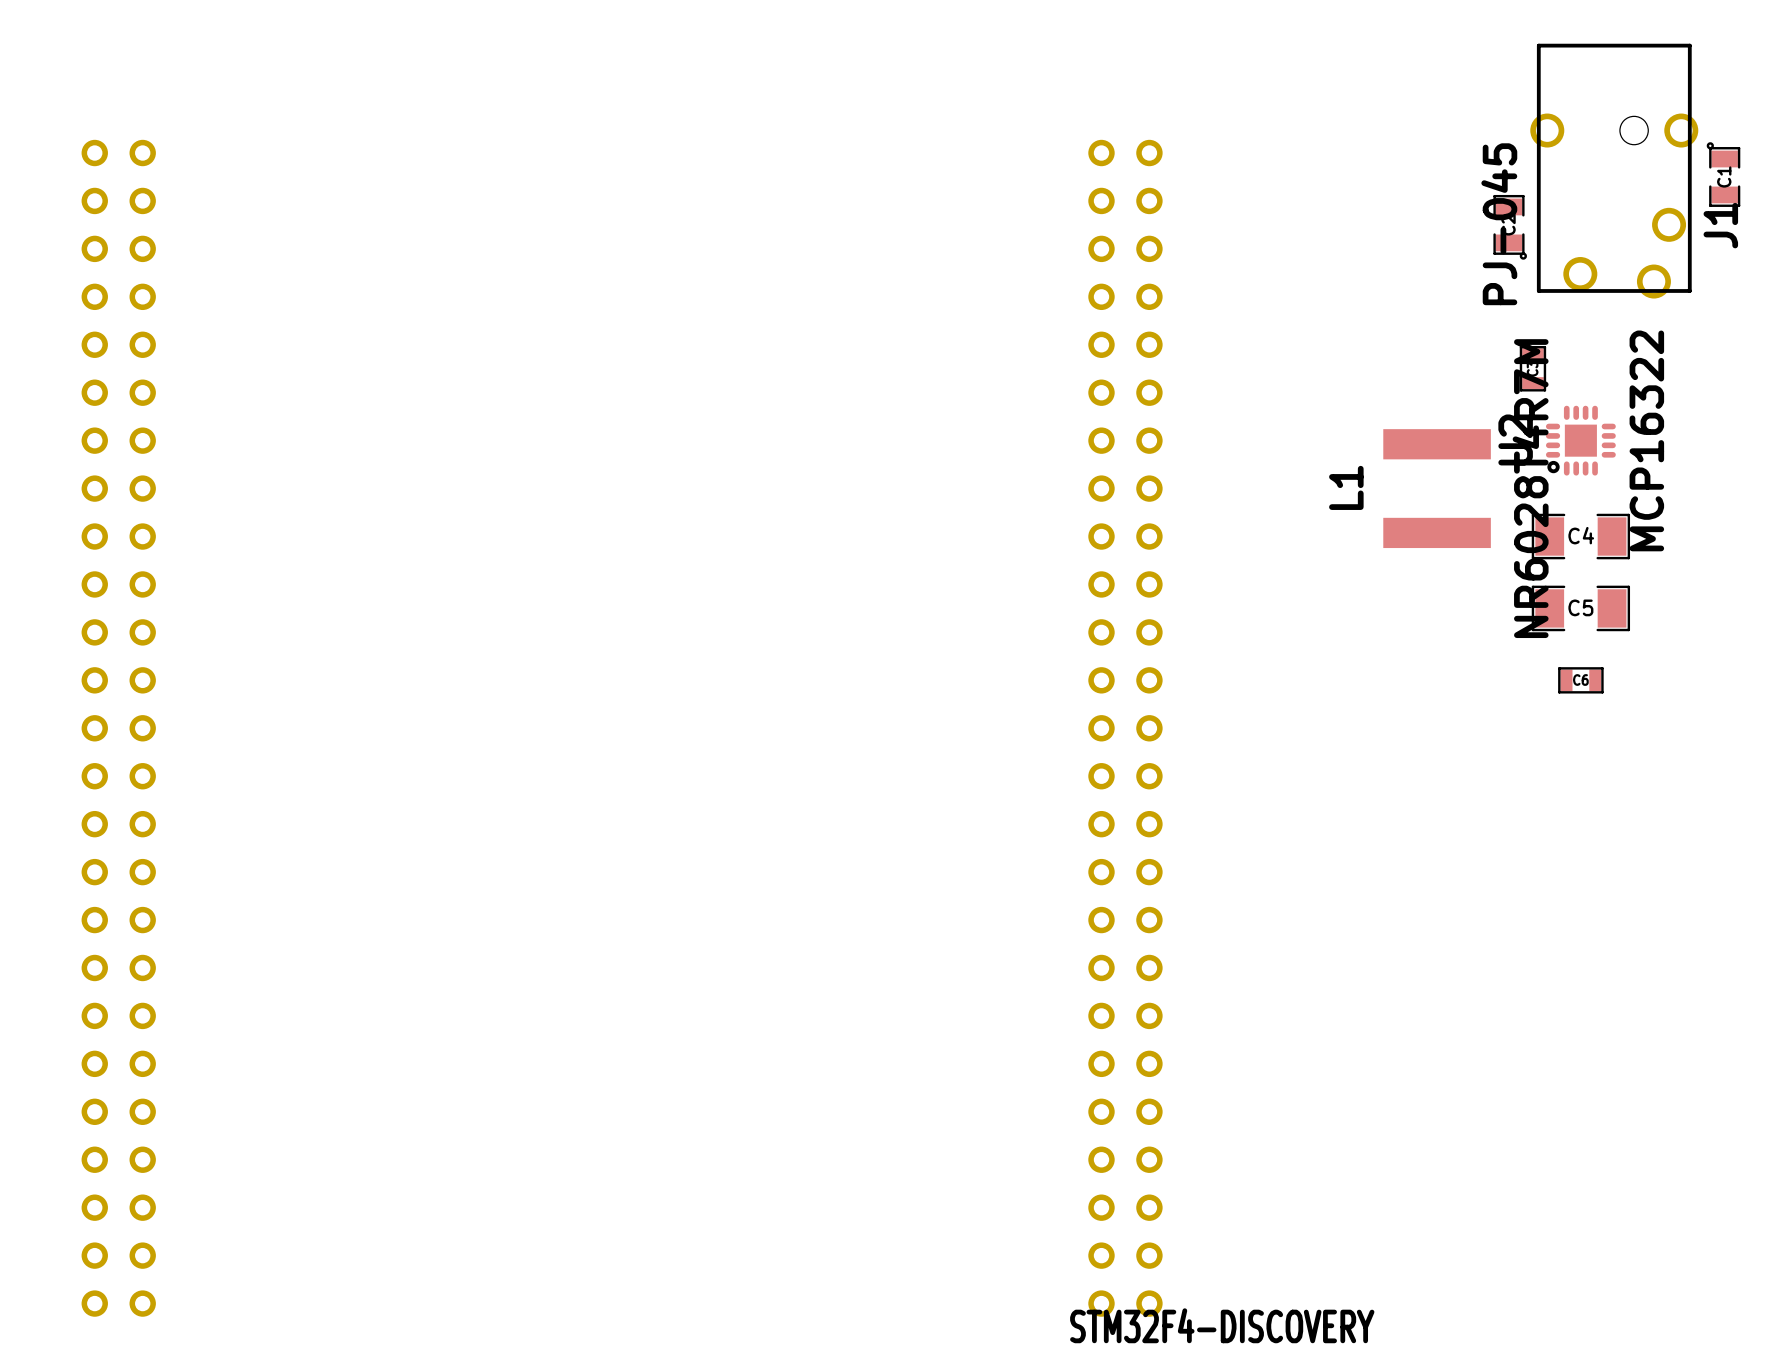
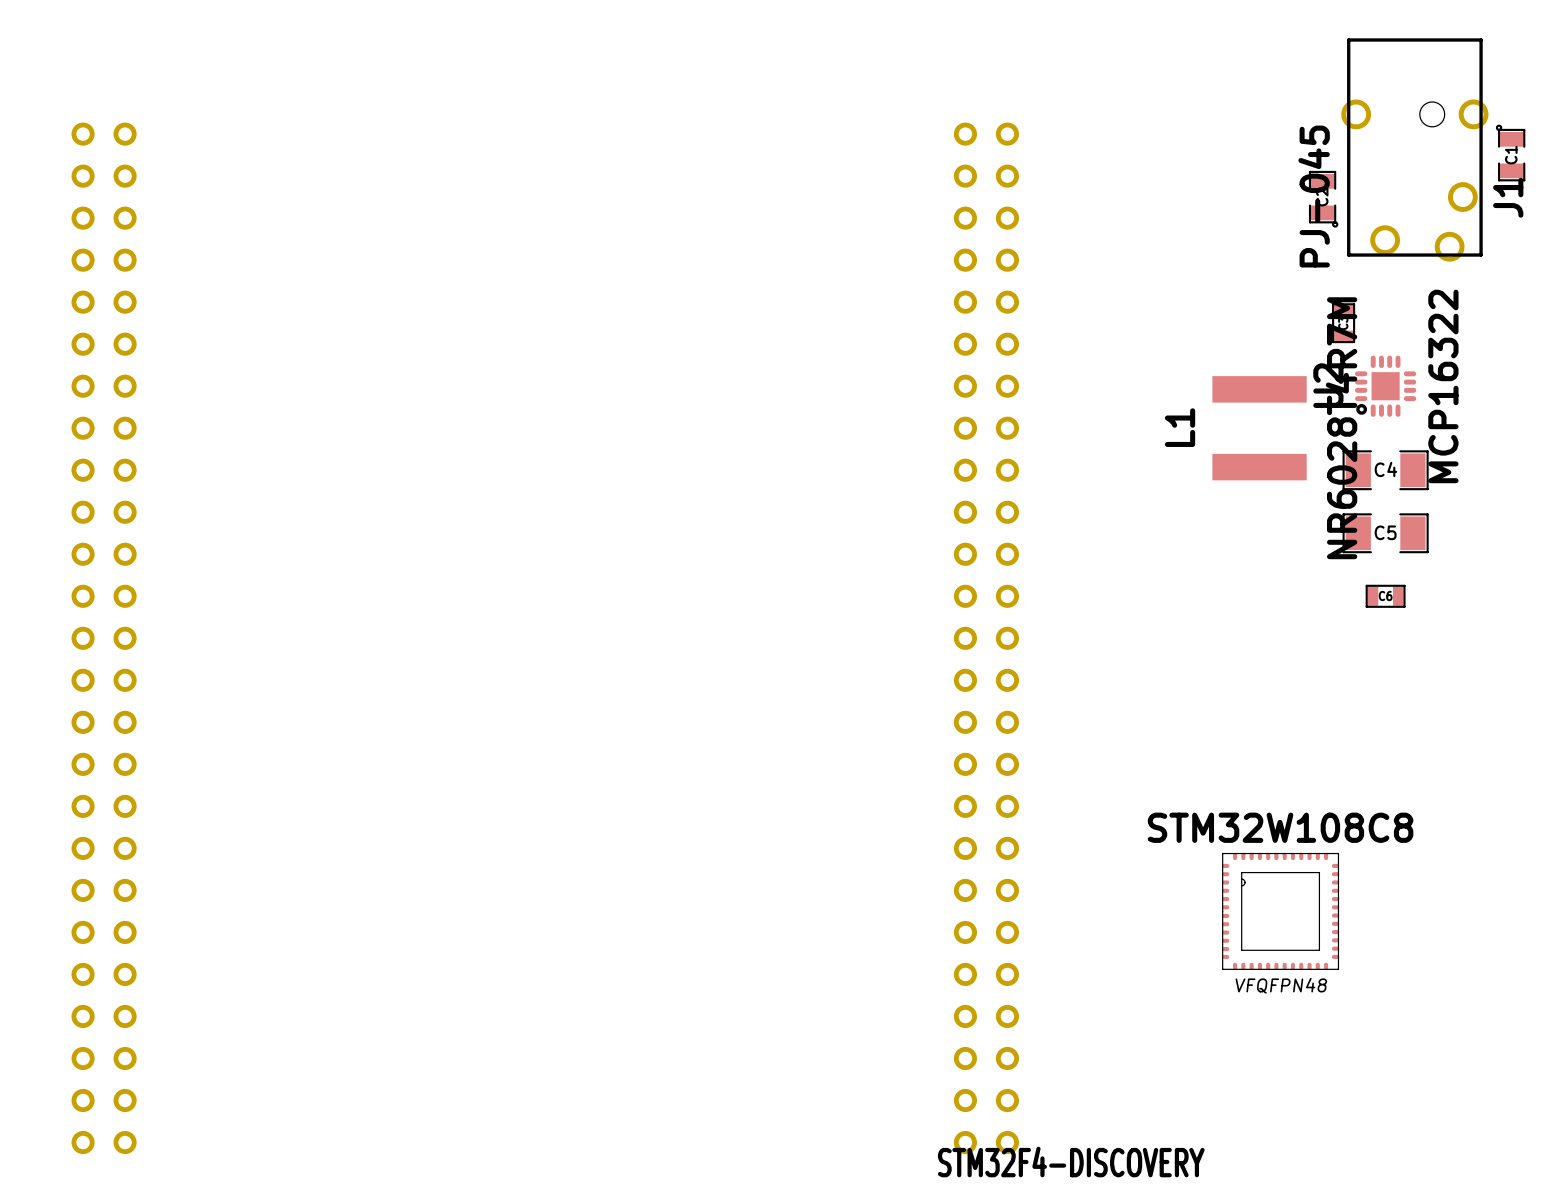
STM32W108C8: none -> VFQFPN48 (1280, 911)

